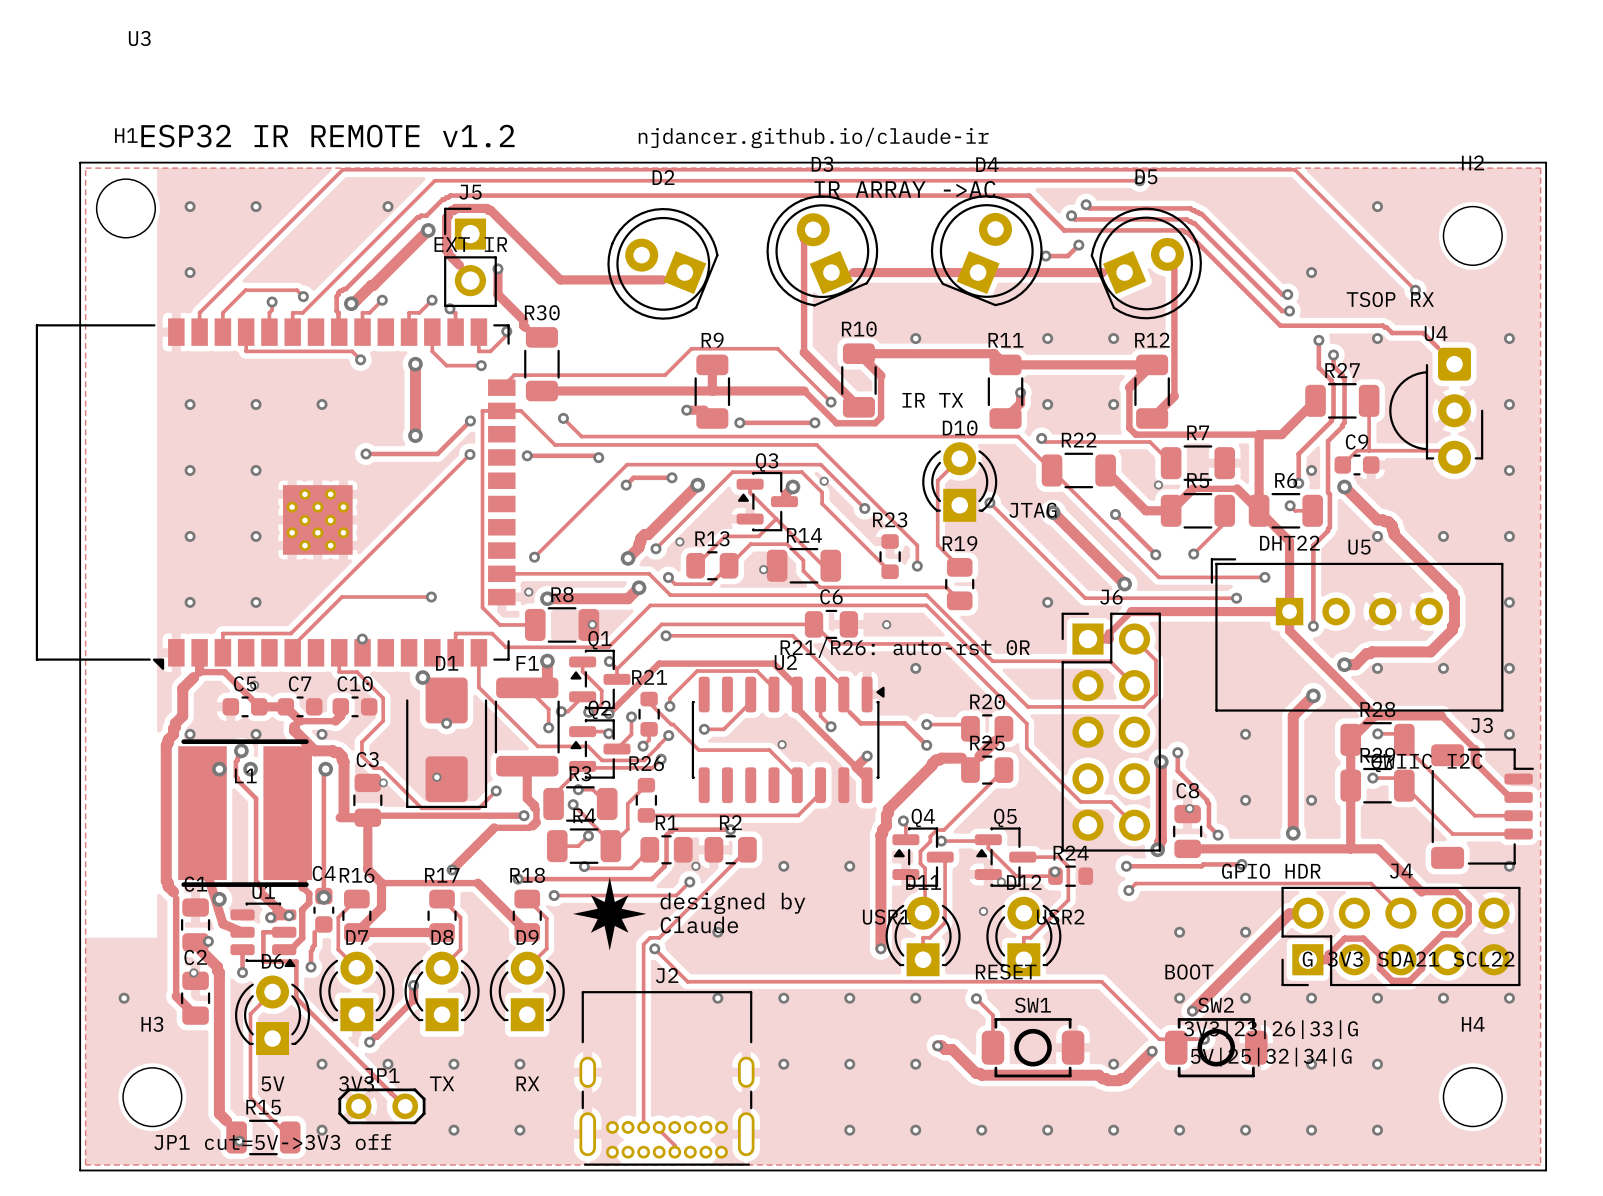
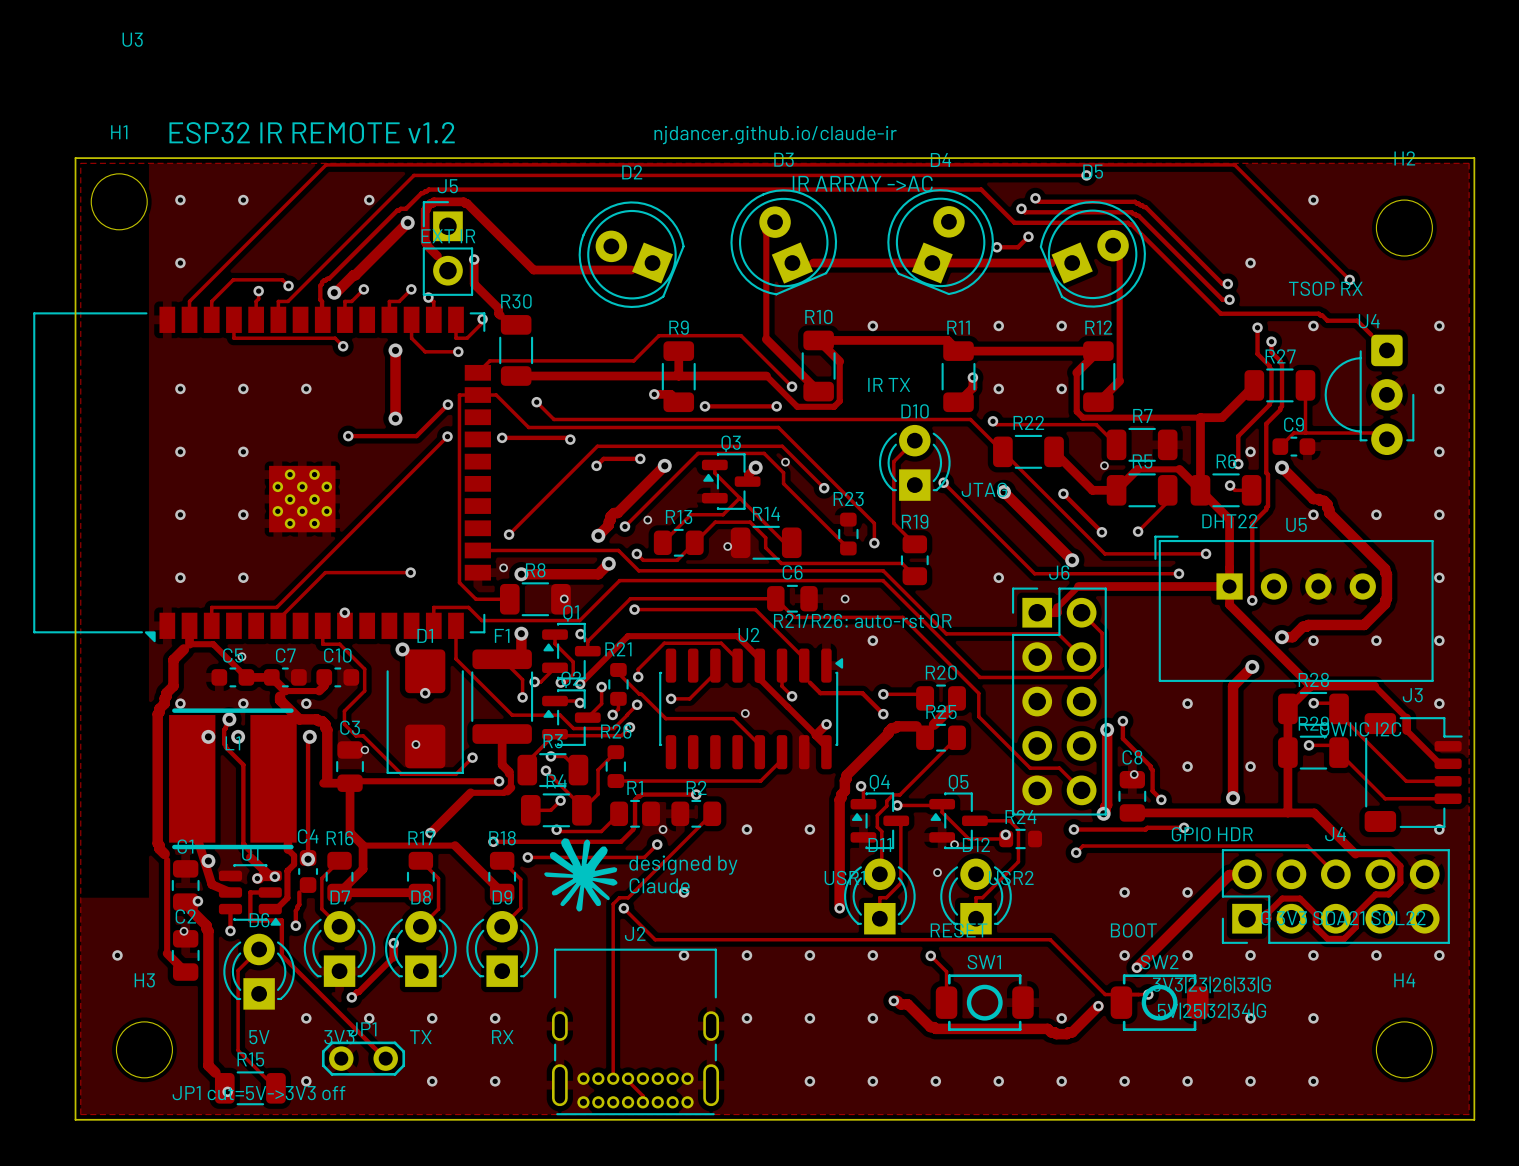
drawing: none -> [544, 838, 618, 912]
drawing: [573, 877, 647, 951] -> none

